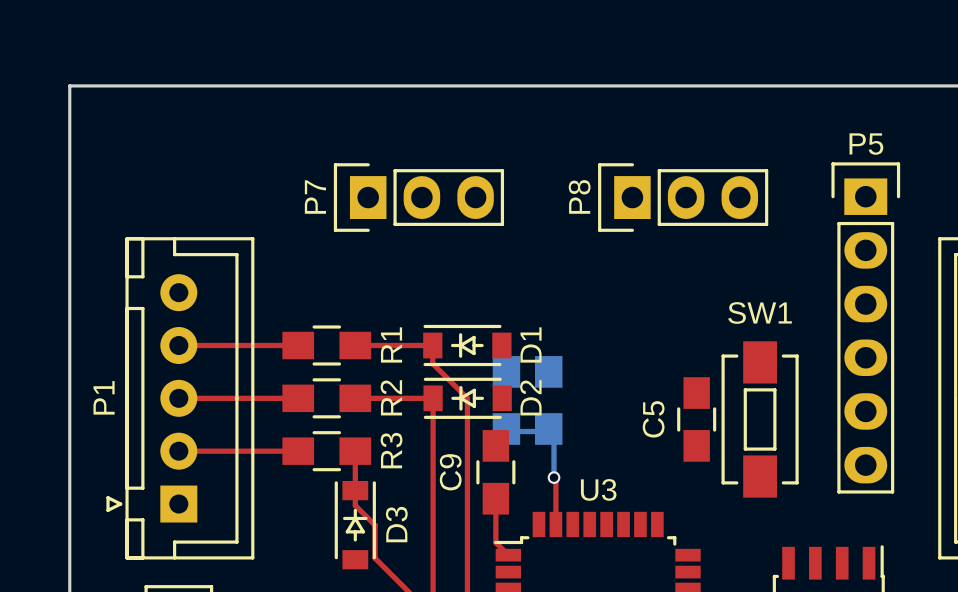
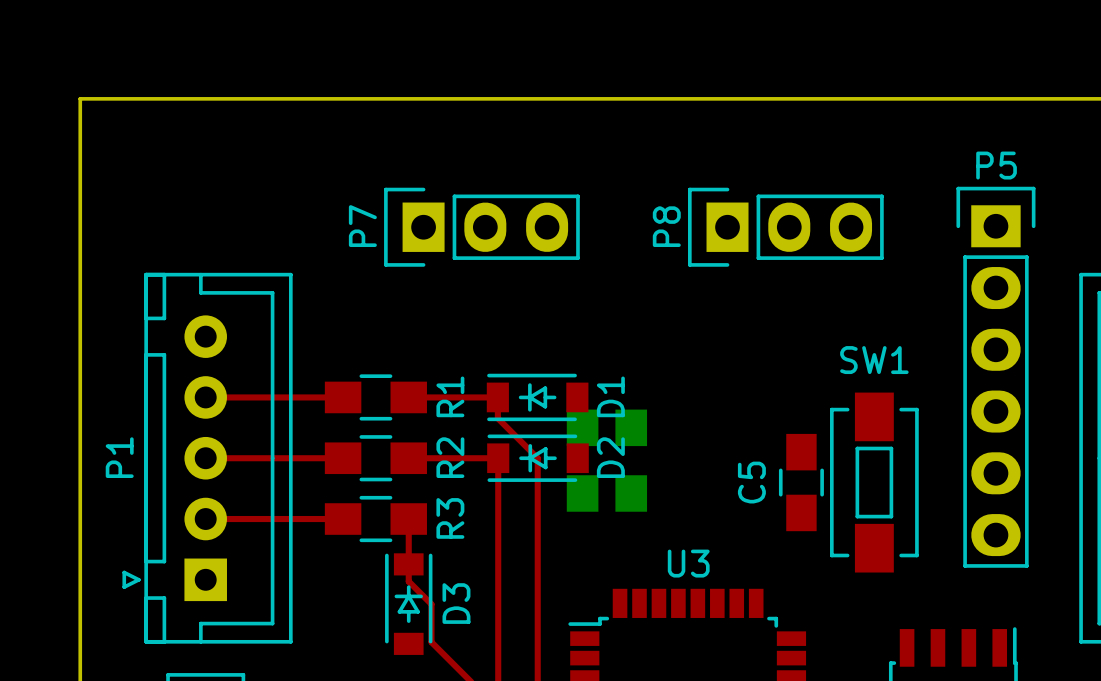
bottom track: (506, 431) (548, 431) (554, 436) (554, 477) -> none
C9: (495, 472) -> none
top track: (554, 477) (555, 479) (555, 524) -> none
via: (554, 477) -> none
top track: (495, 498) (495, 542) (508, 555) -> none

